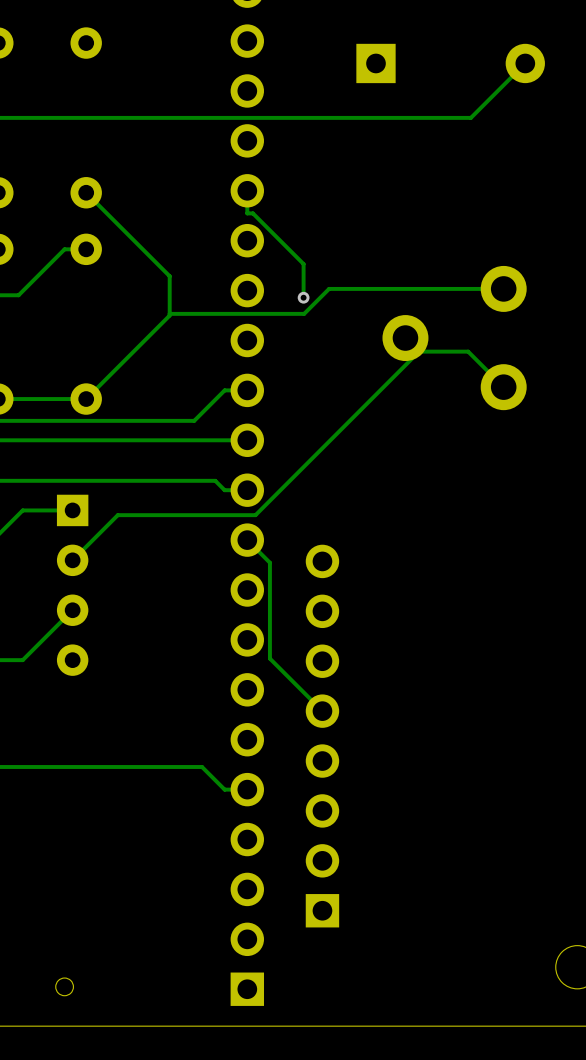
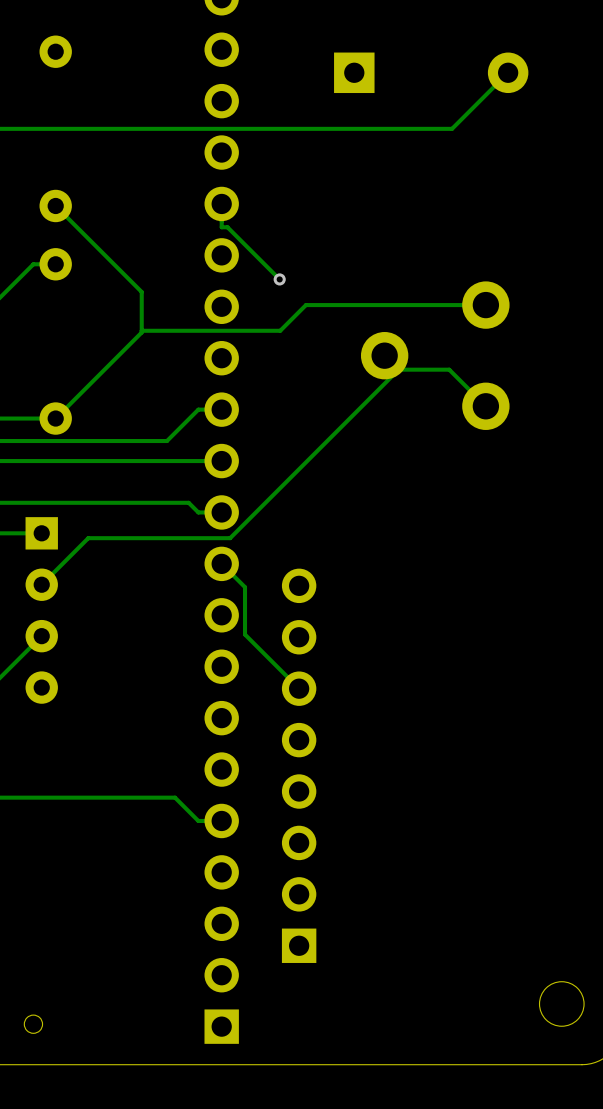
track: (303, 264) (303, 297) -> none
via position: (303, 297) -> (279, 279)
track: (269, 608) (269, 658) (322, 711) -> (245, 634) (299, 688)

